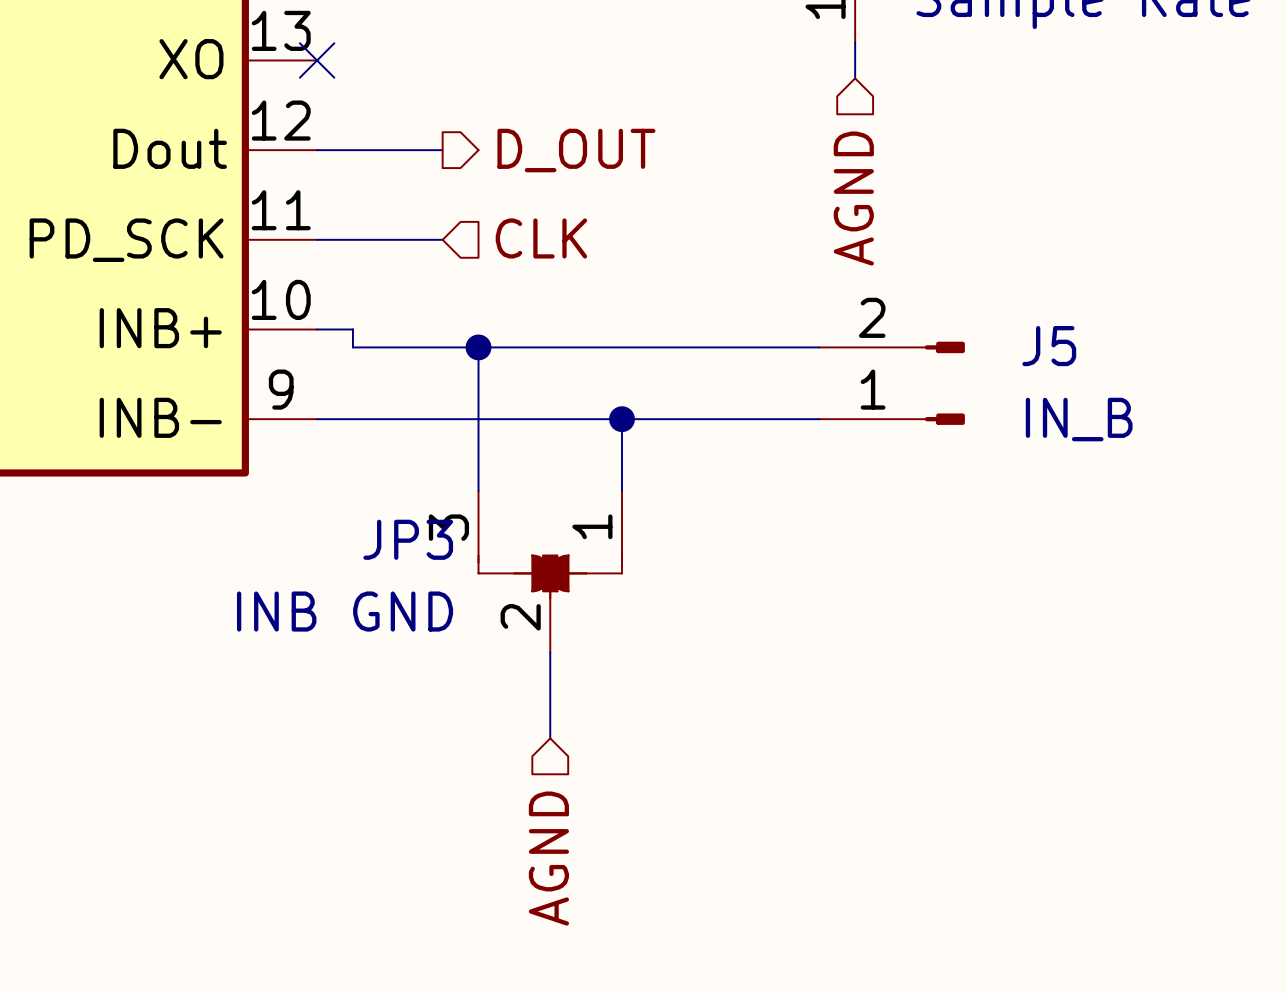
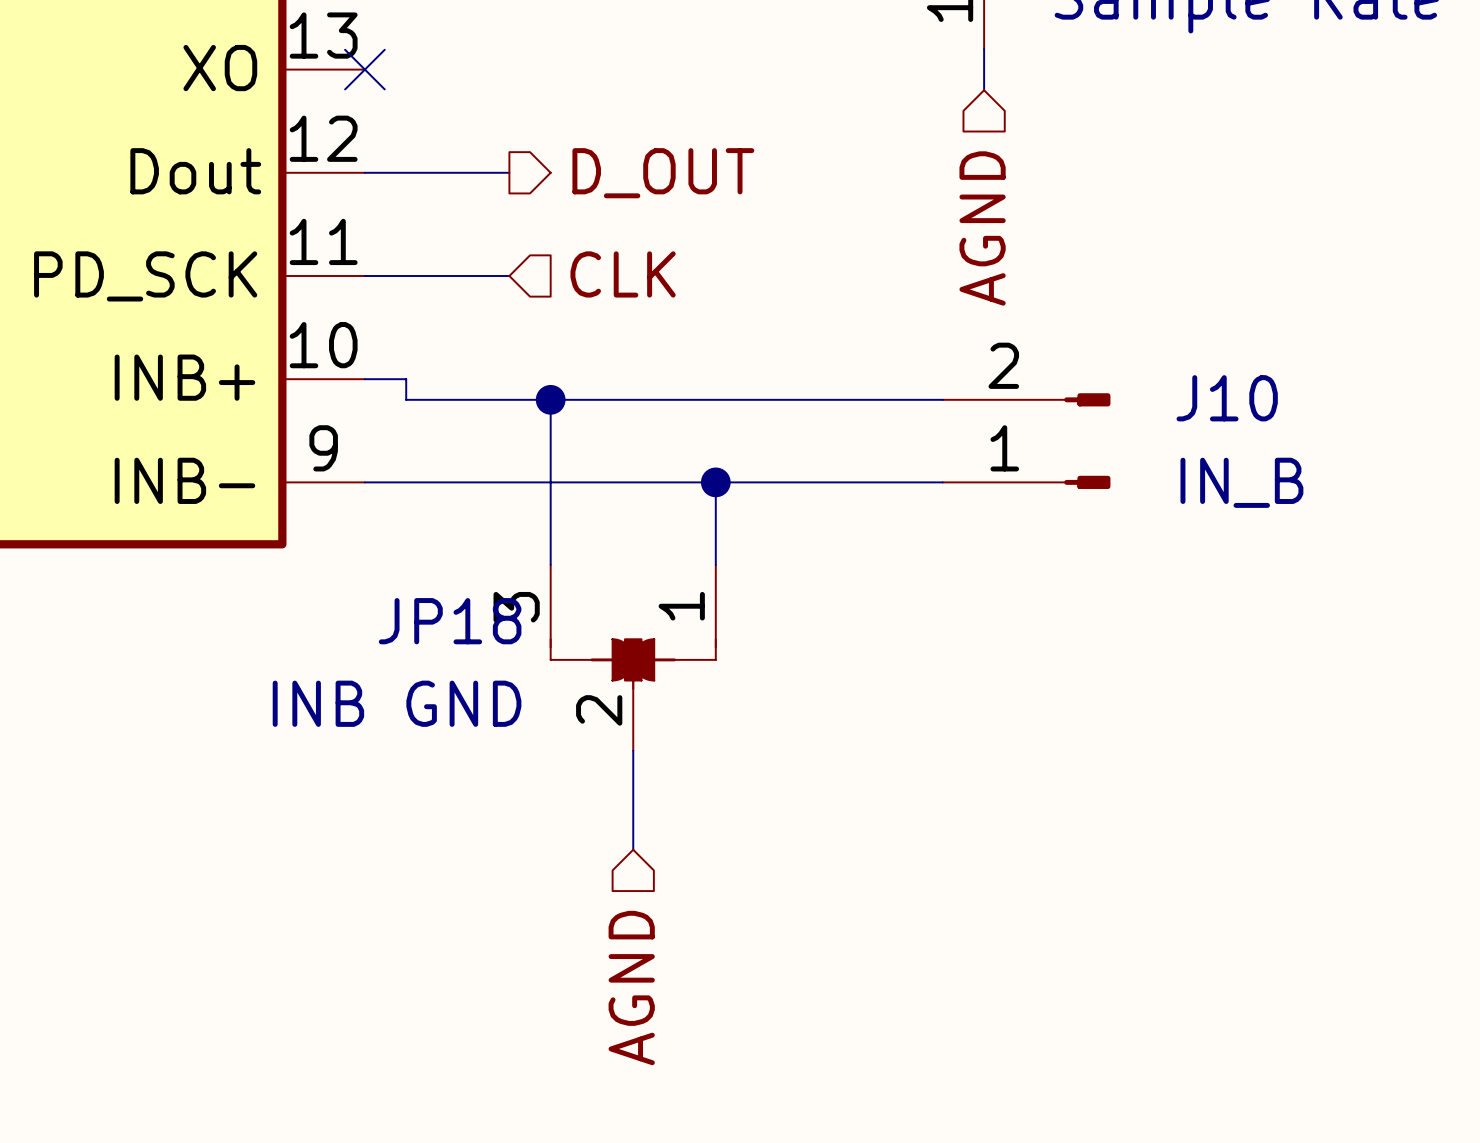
J5 name: J5 (1049, 346) -> J10 (1227, 398)
JP3 name: JP3 (408, 539) -> JP18 (450, 621)

